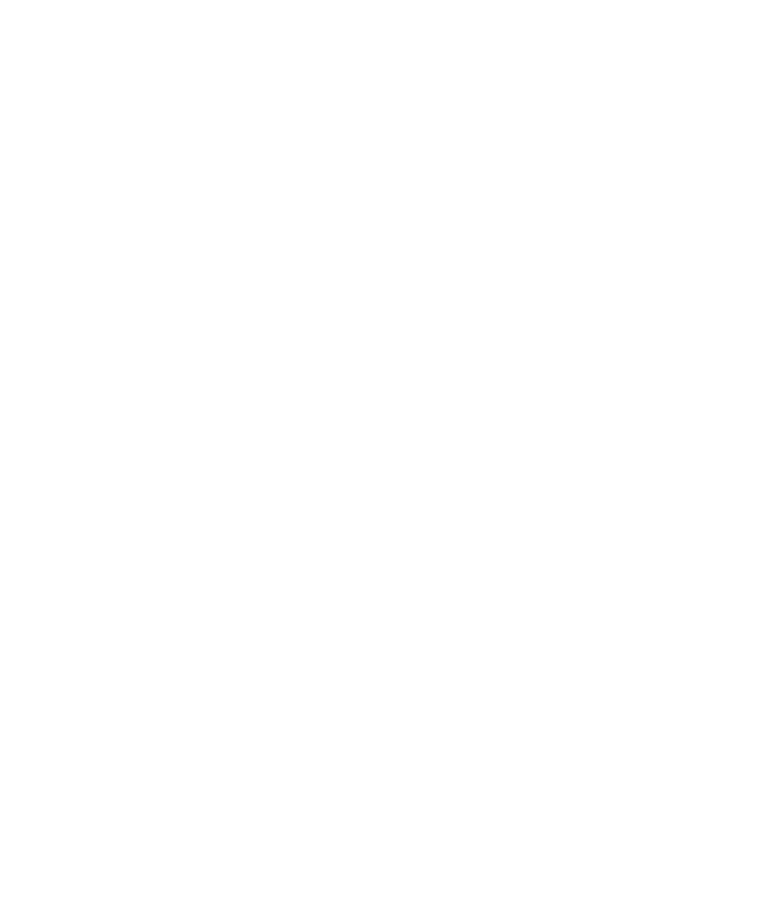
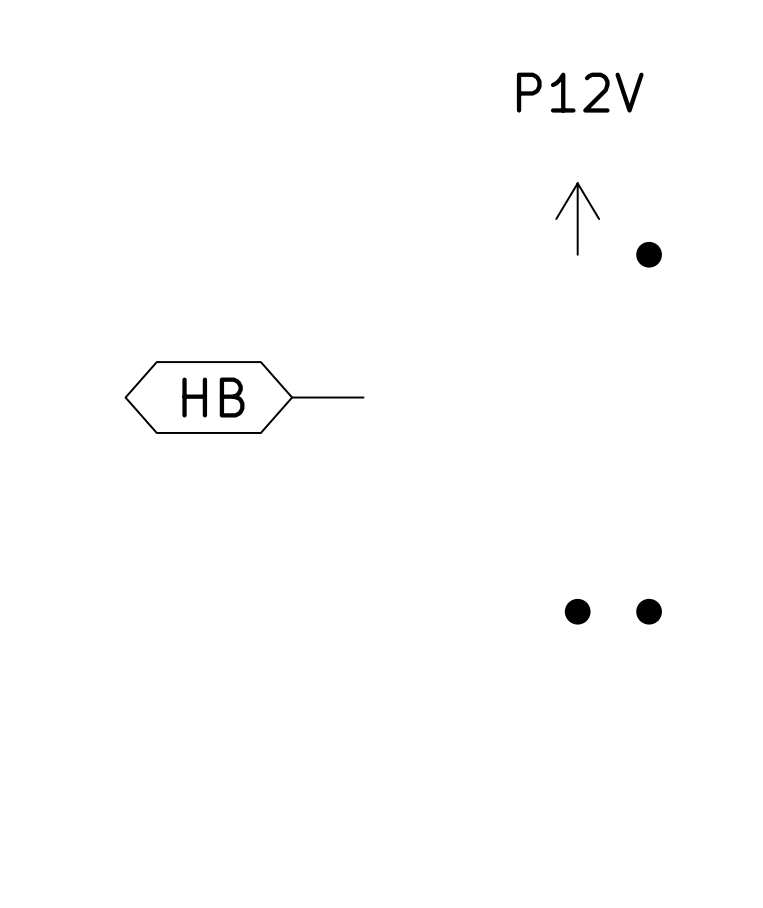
power symbol: none -> P12V (577, 219)
junction: none -> (649, 254)
global label: none -> HB (213, 397)
wire: none -> (292, 397) (363, 397)
junction: none -> (577, 611)
junction: none -> (649, 611)

